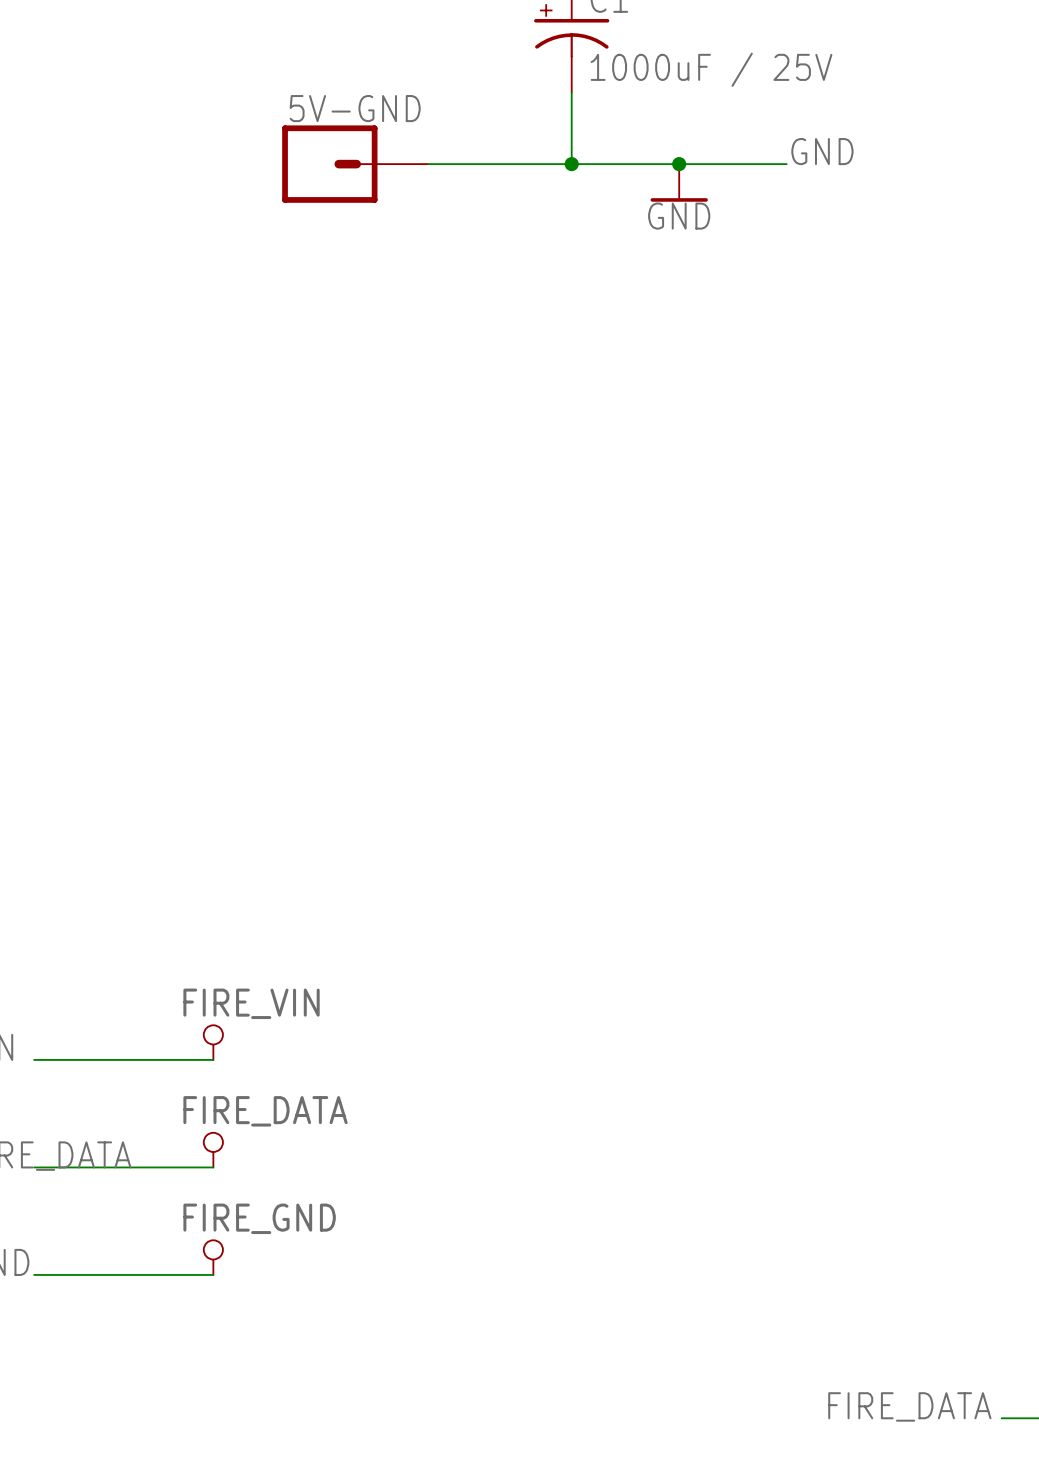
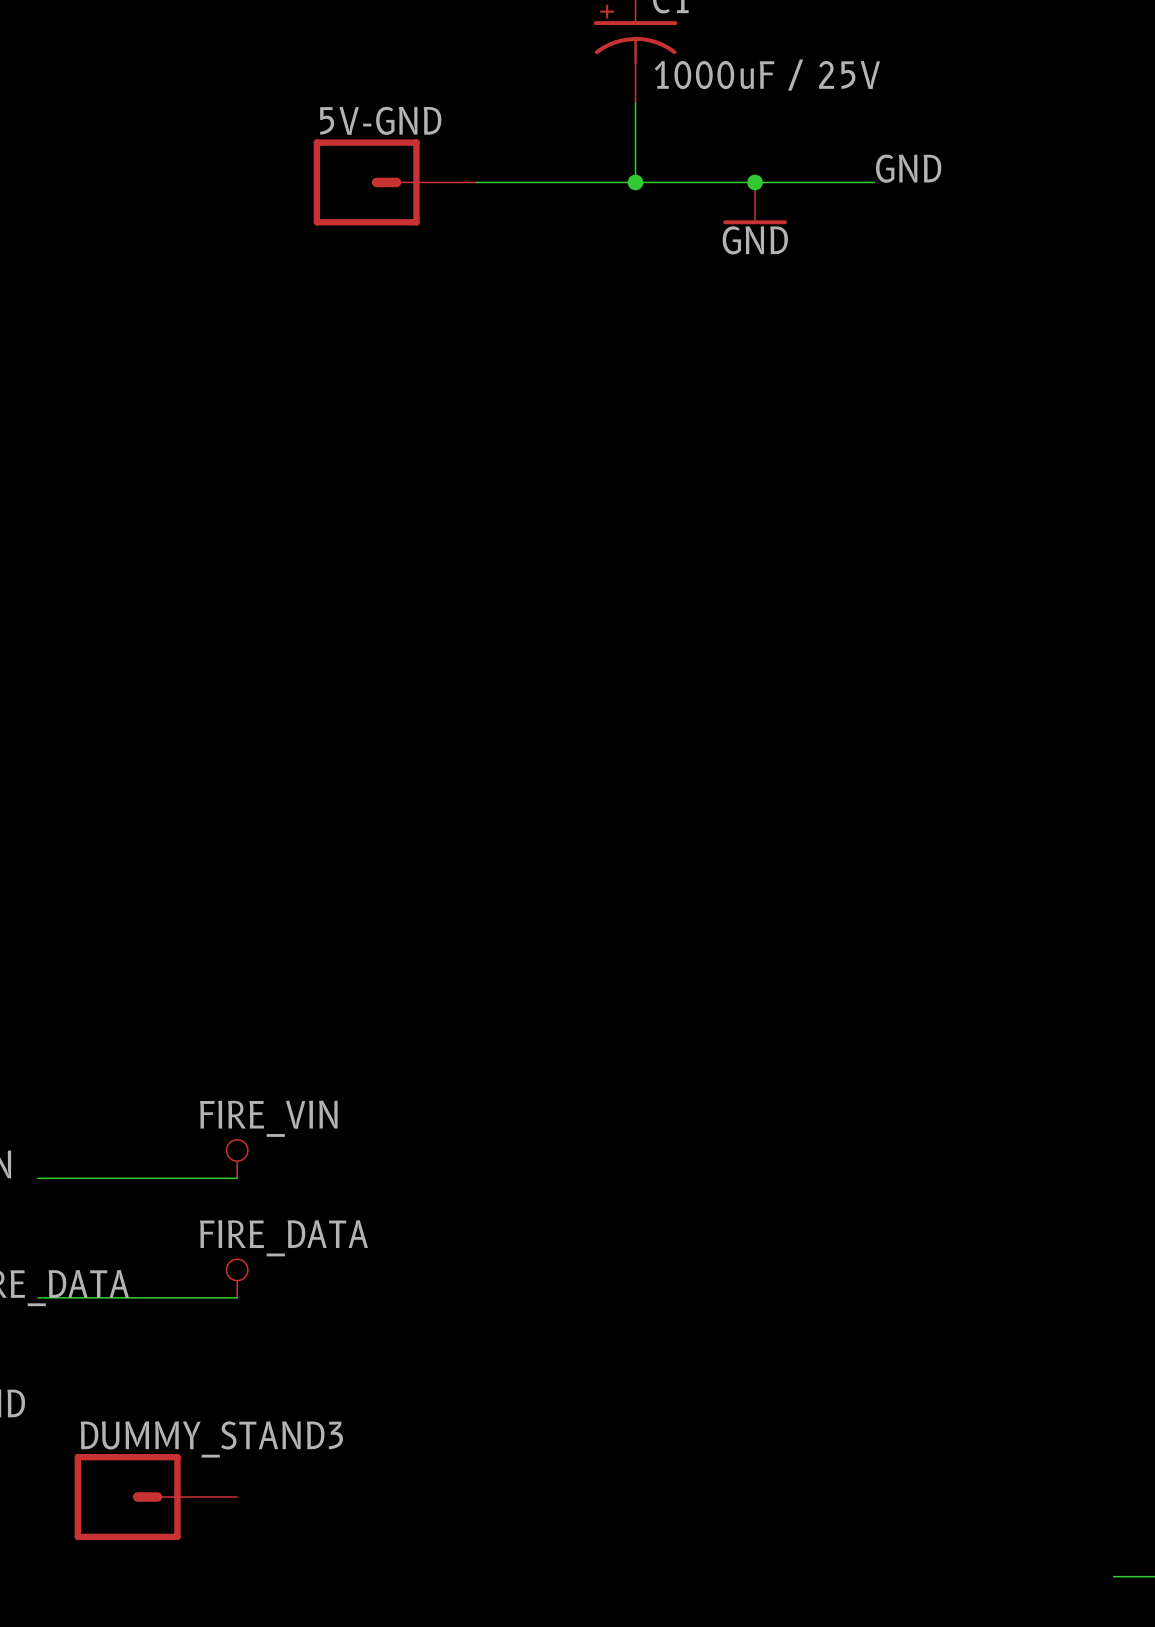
FIRE_GND: (213, 1257) -> none
wire: (34, 1274) (213, 1274) -> none
DUMMY_STAND3: none -> (155, 1497)
label: FIRE_DATA (909, 1406) -> none

